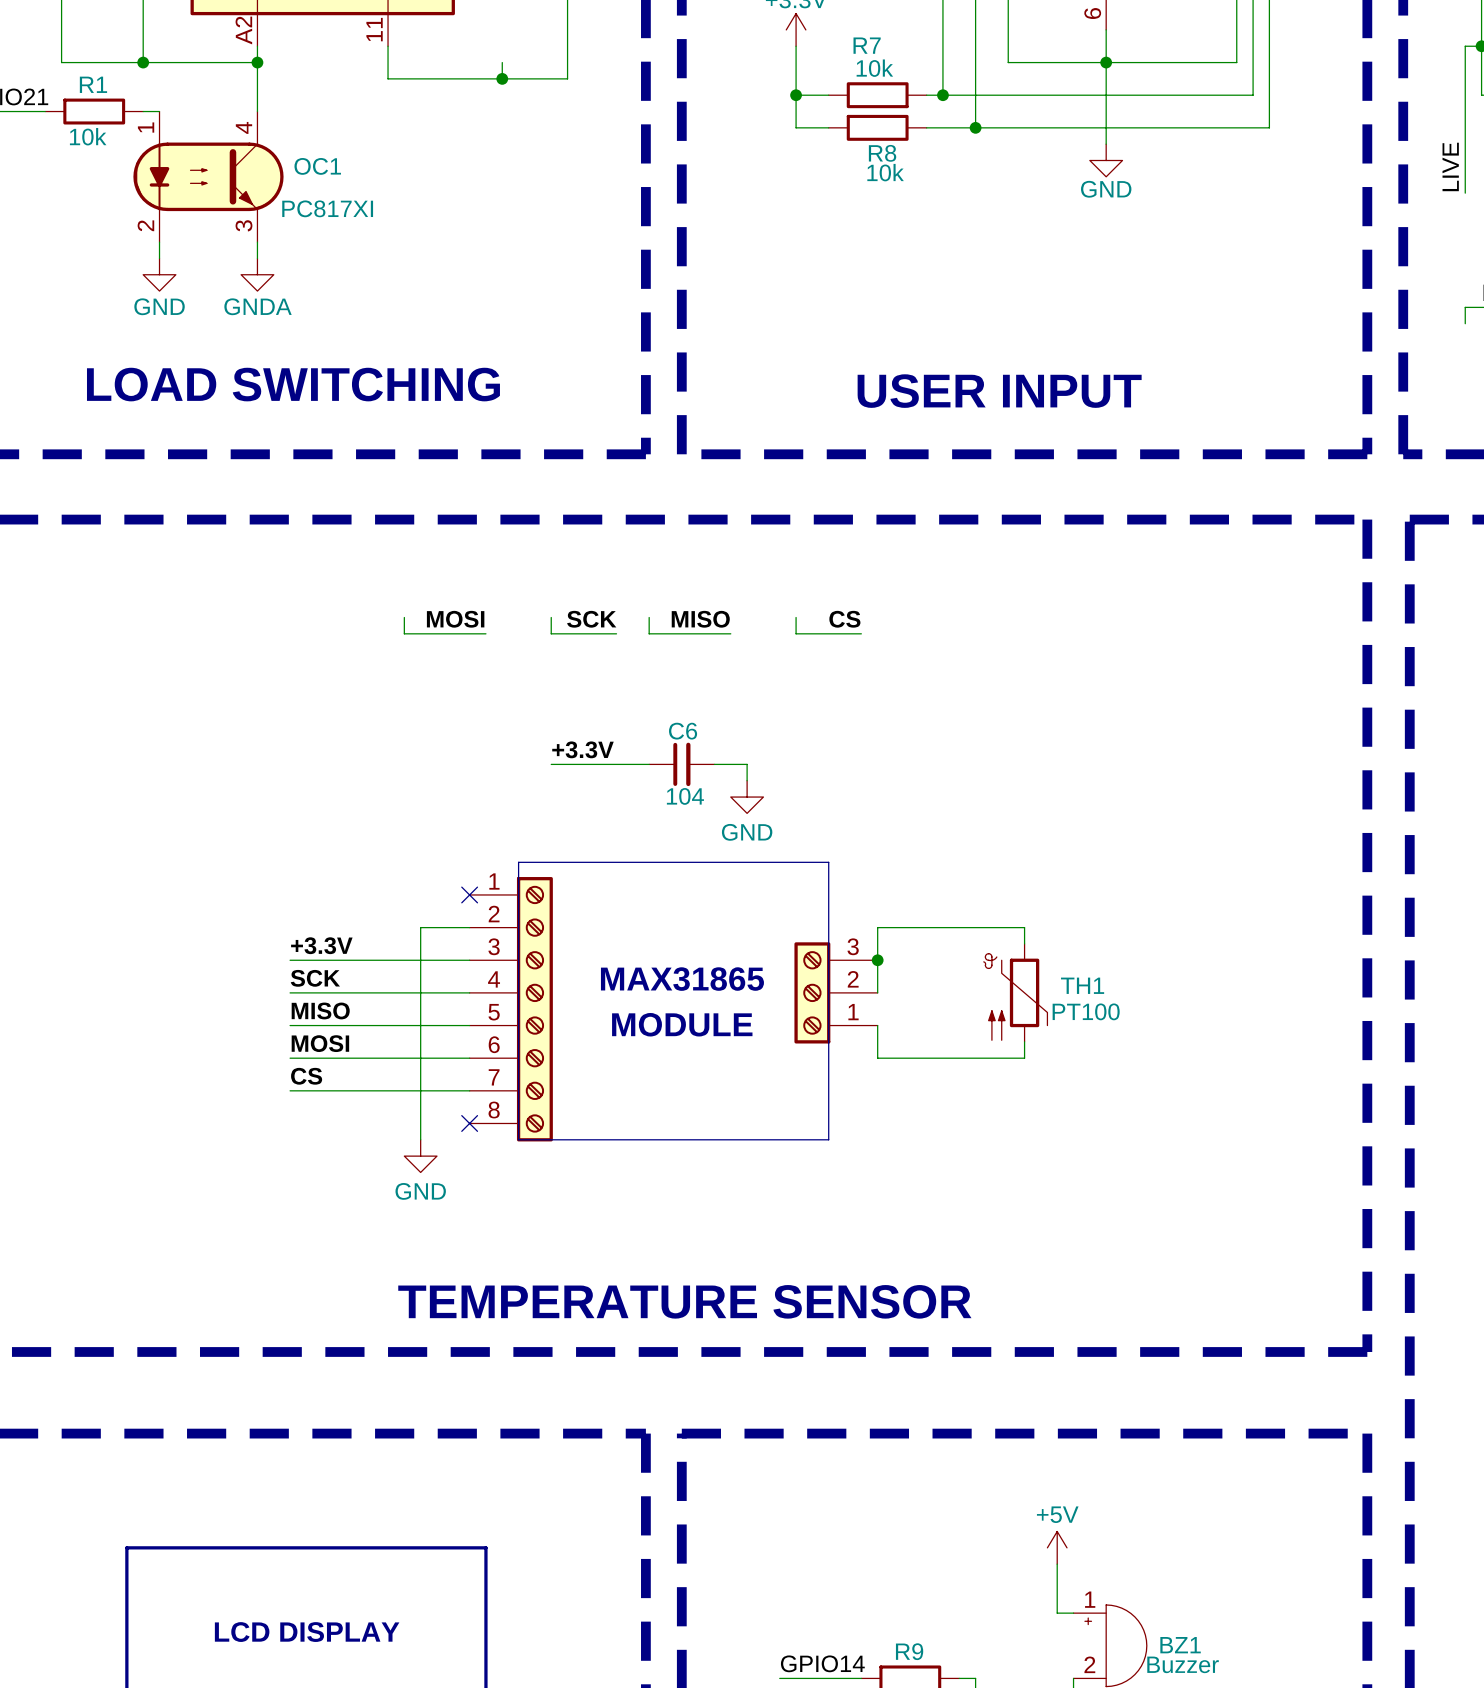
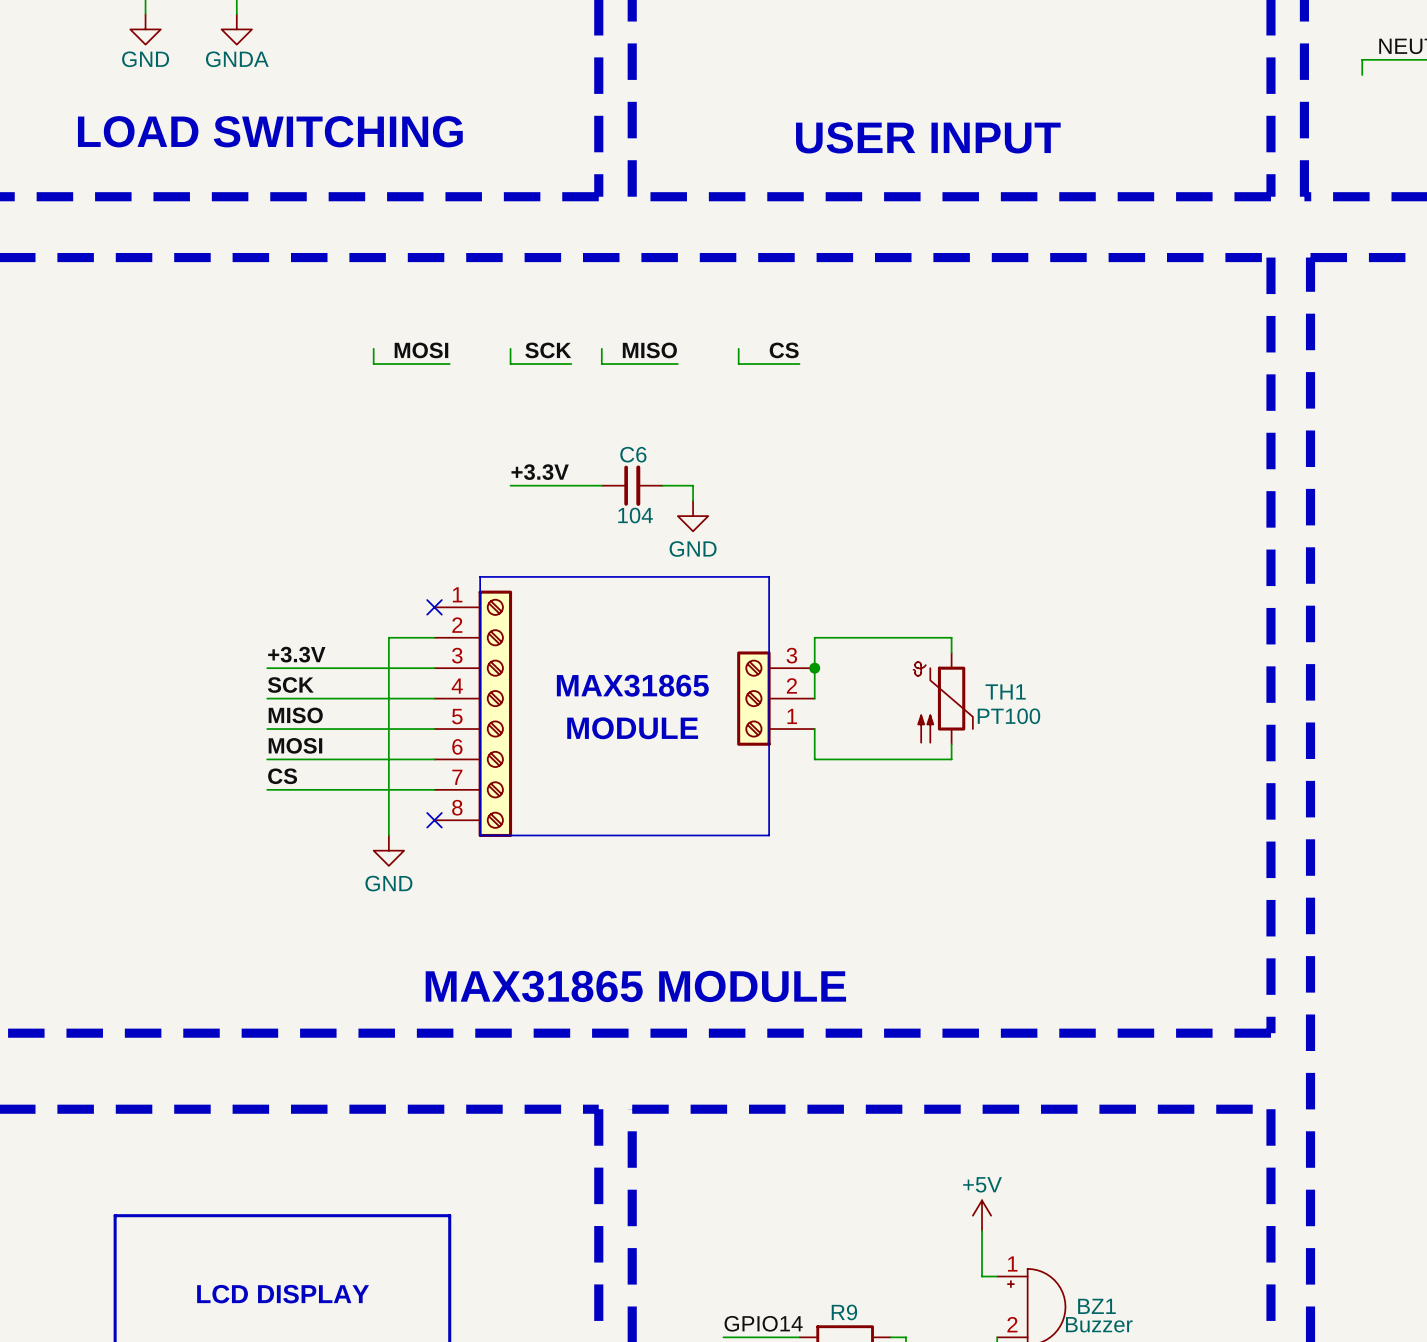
text: TEMPERATURE SENSOR (684, 1301) -> MAX31865 MODULE (635, 986)

